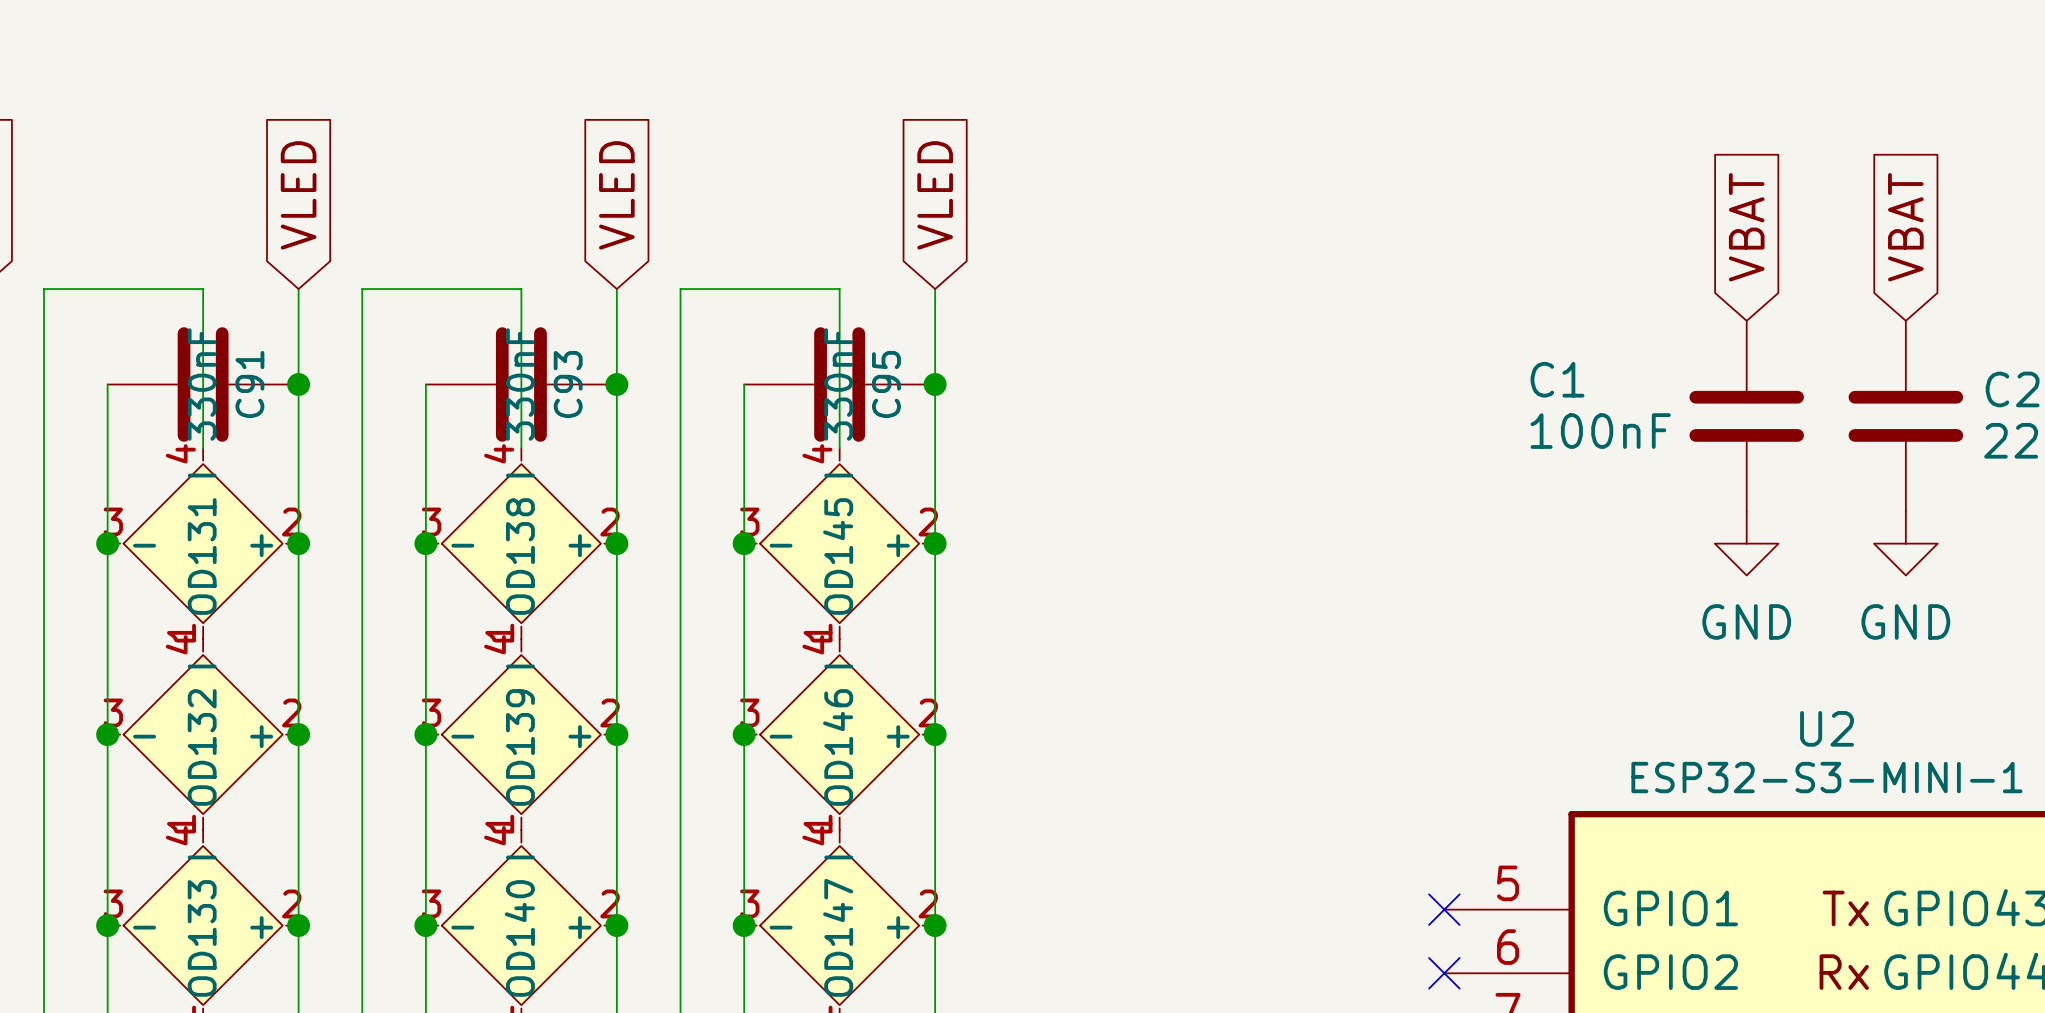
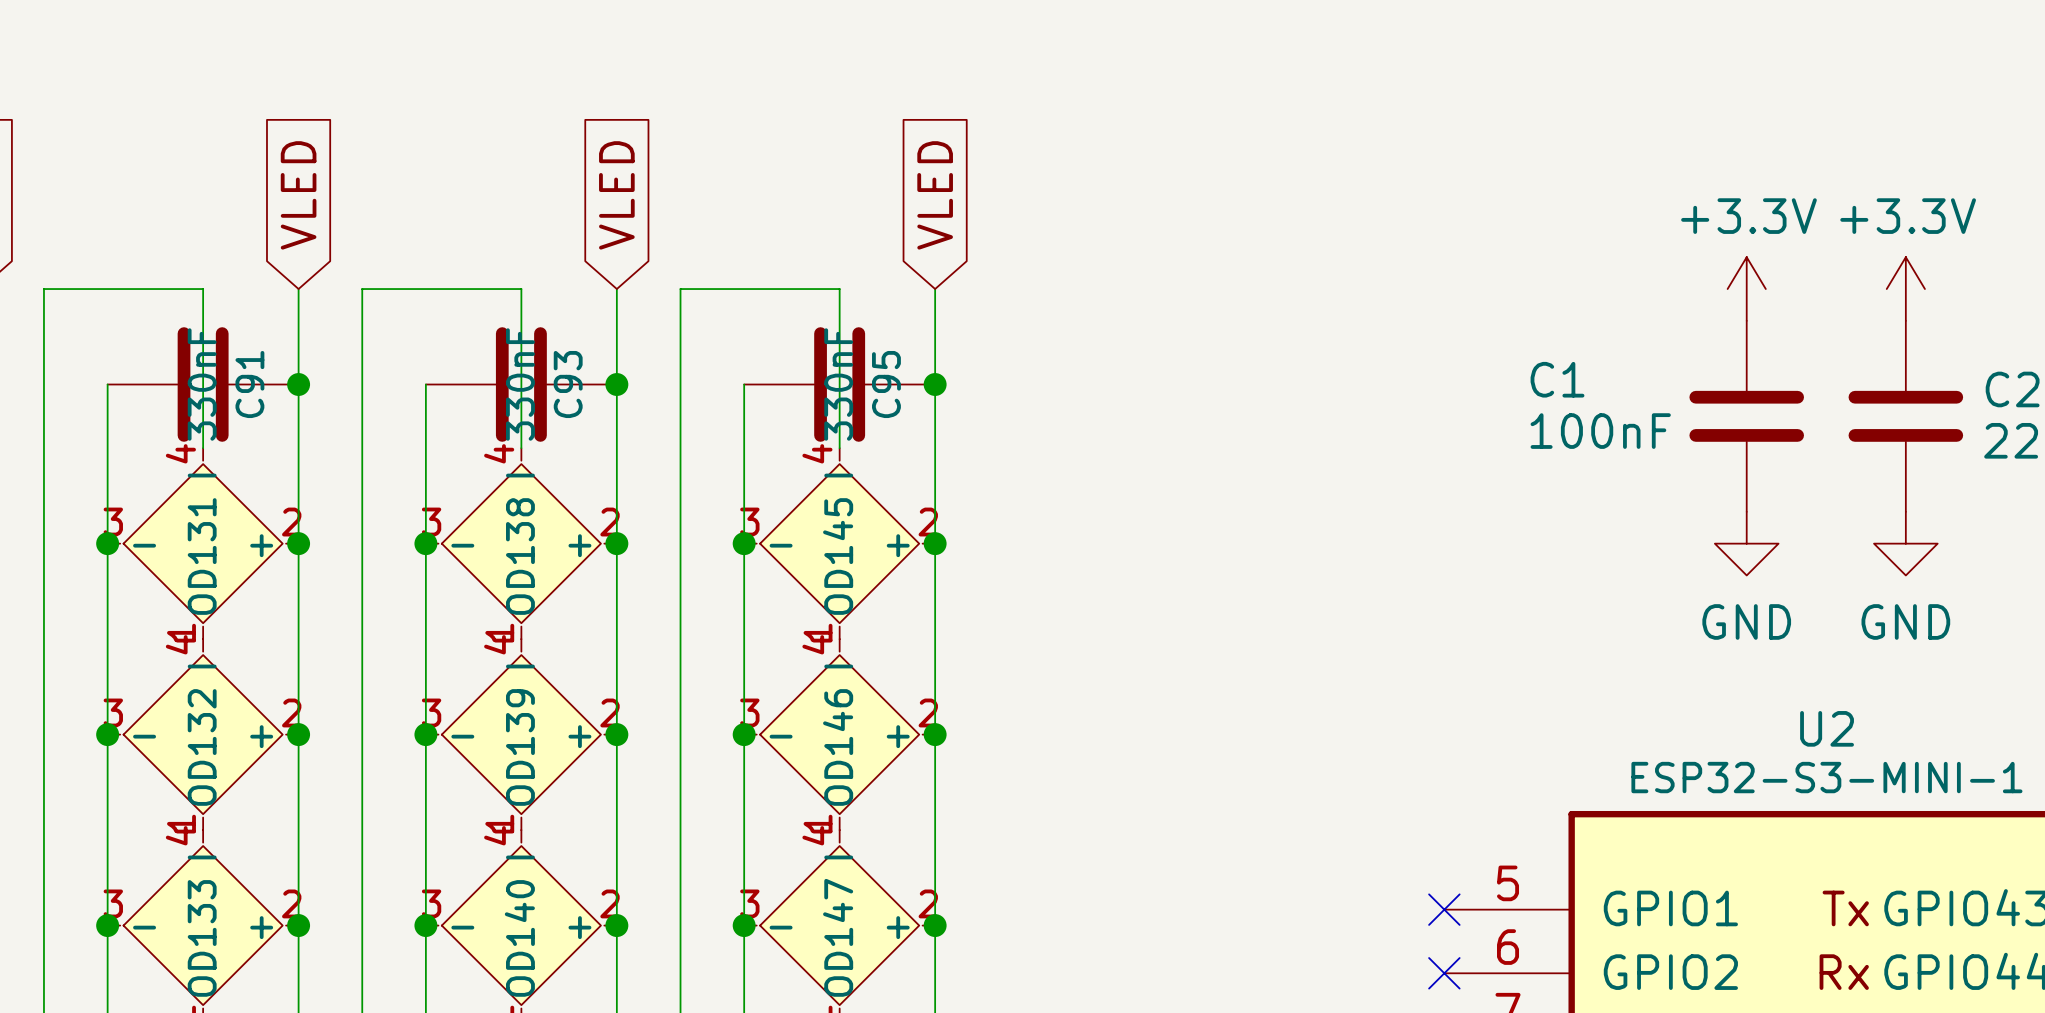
global label: VBAT (1746, 227) -> none
global label: VBAT (1905, 227) -> none
power symbol: none -> +3.3V (1746, 289)
power symbol: none -> +3.3V (1905, 289)

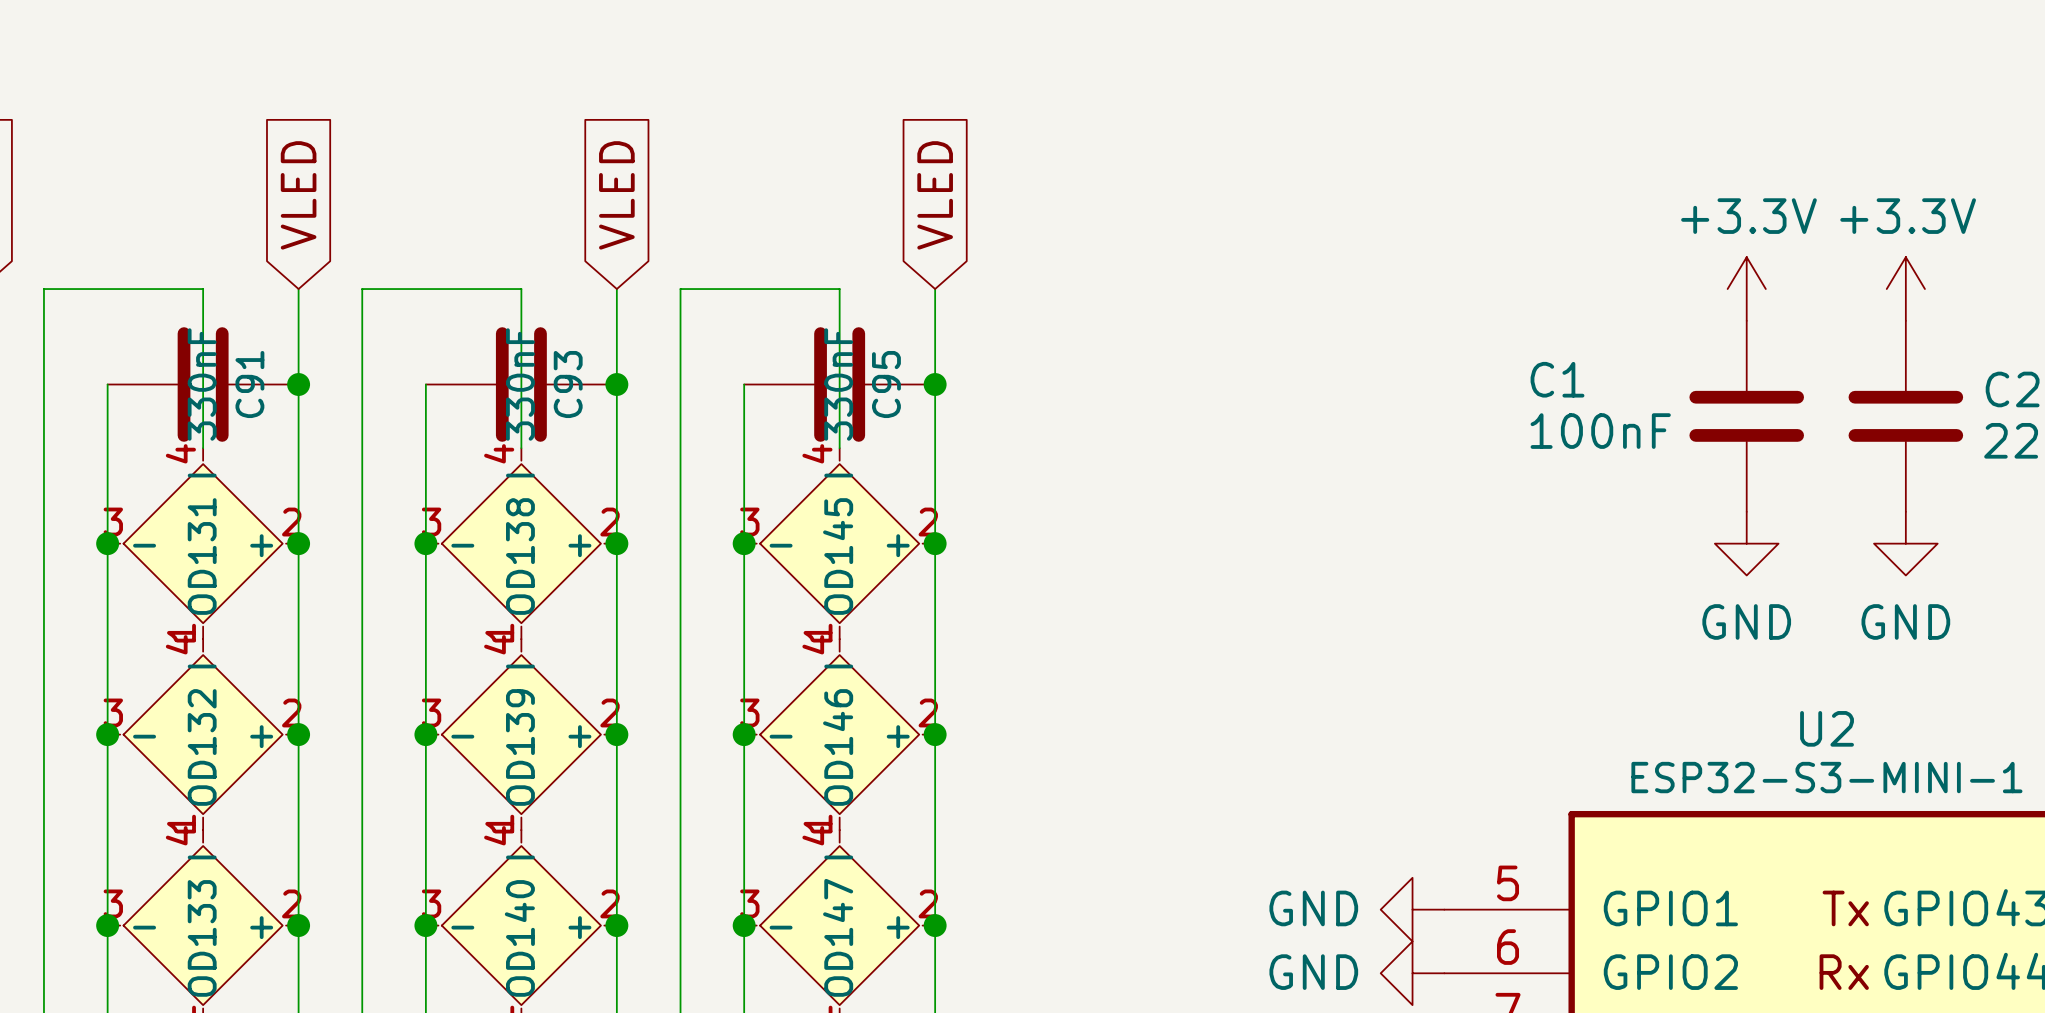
power symbol: none -> GND (1412, 909)
no-connect mark: (1444, 909) -> none
power symbol: none -> GND (1412, 973)
no-connect mark: (1444, 973) -> none

